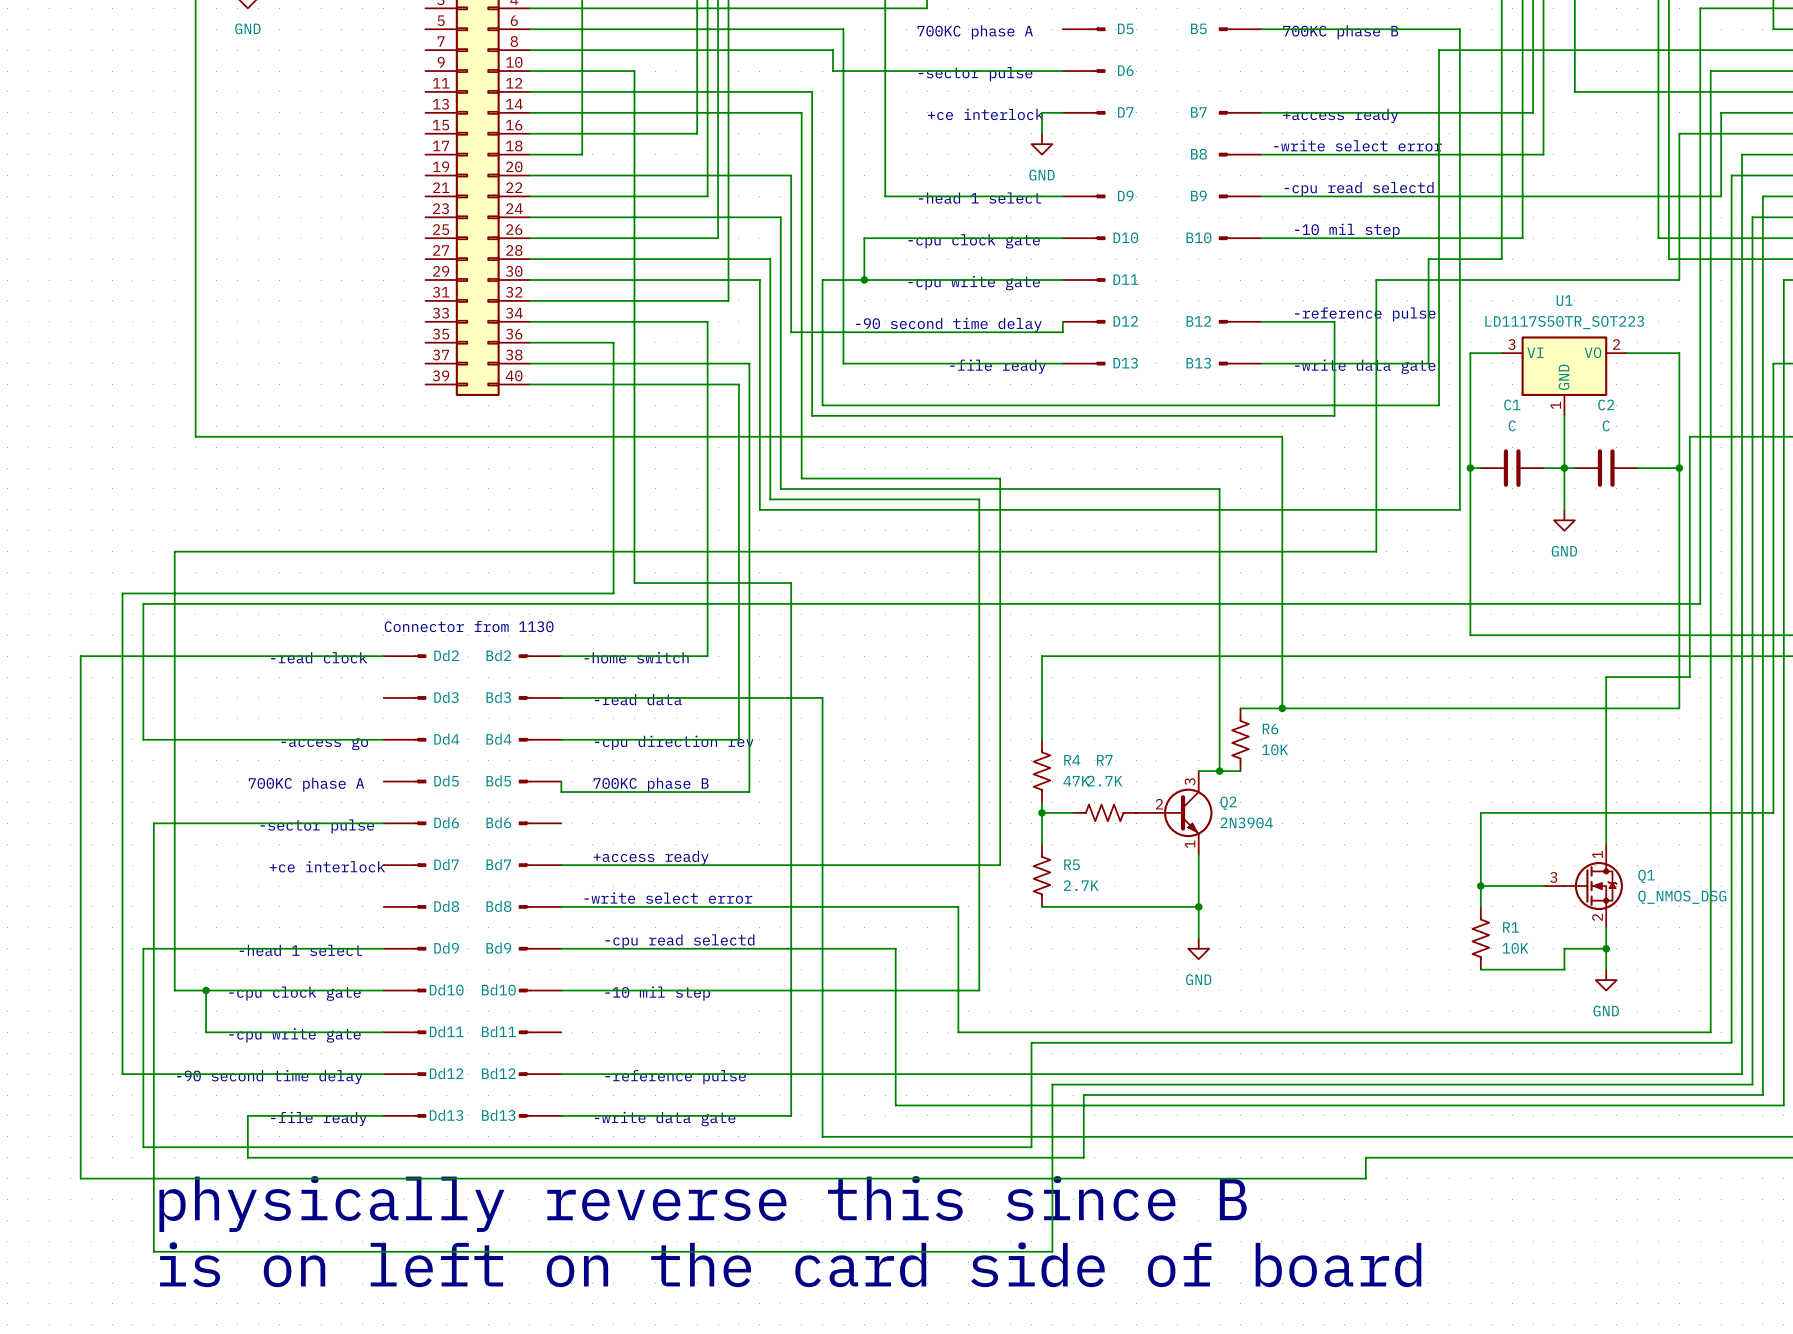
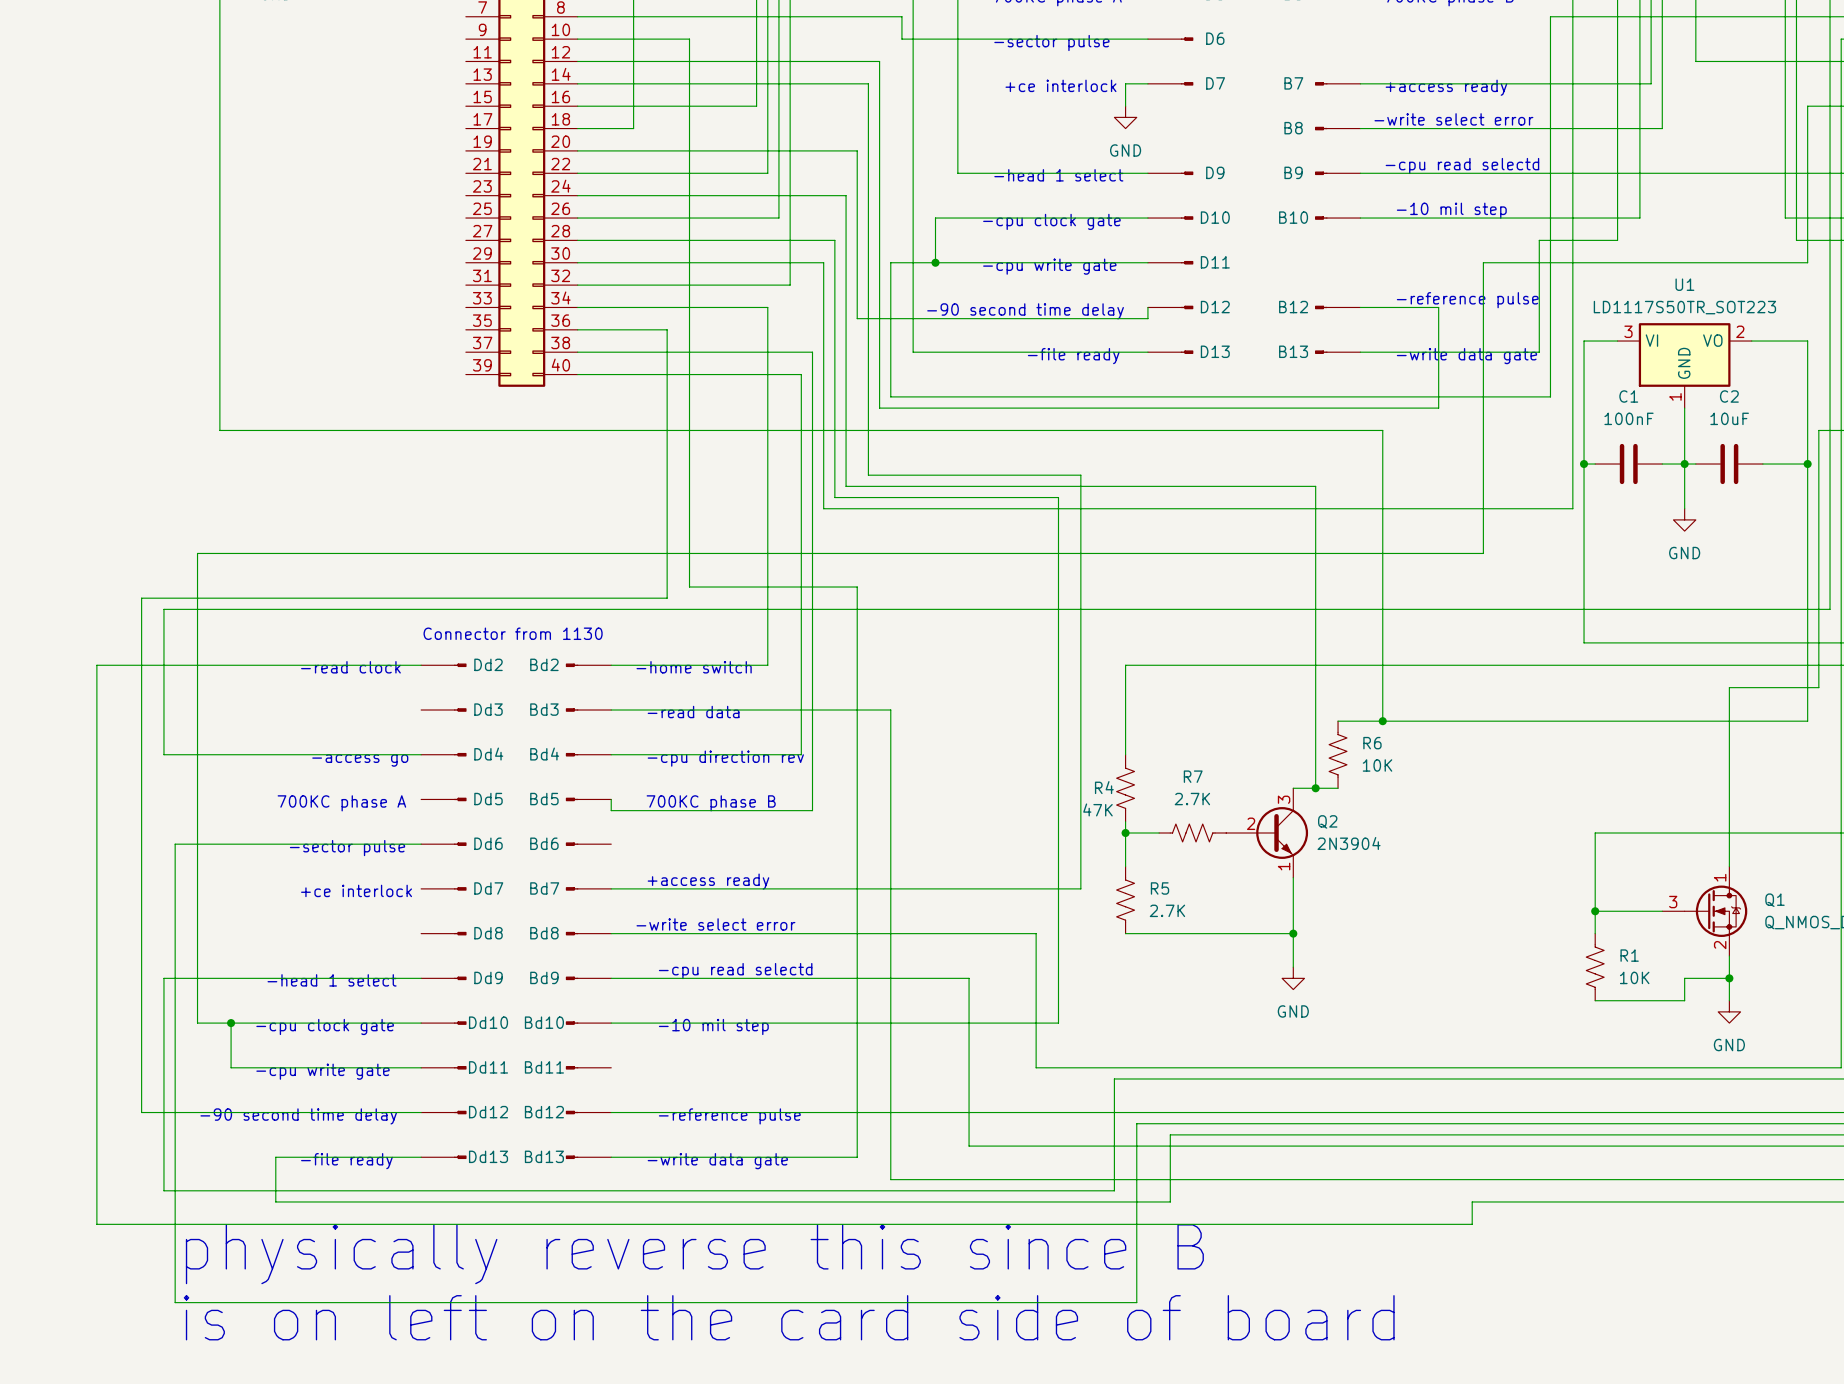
C1 value: C (1512, 425) -> 100nF (1629, 418)
C2 value: C (1606, 425) -> 10uF (1729, 418)
R4 name position: R4 (1072, 760) -> R4 (1104, 787)
R4 value position: 47K (1076, 781) -> 47K (1097, 809)

